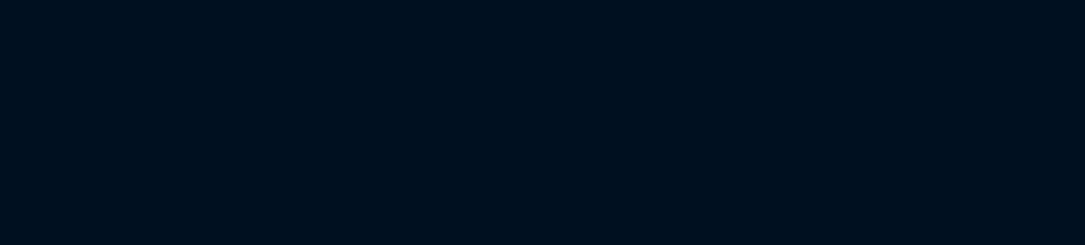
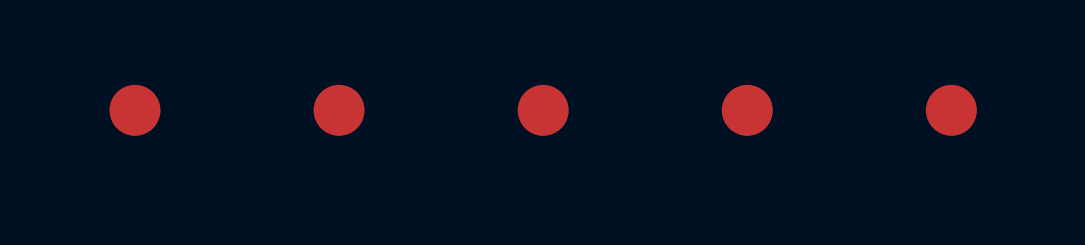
part: none -> (134, 110)
part: none -> (339, 110)
part: none -> (543, 110)
part: none -> (747, 110)
part: none -> (951, 110)

